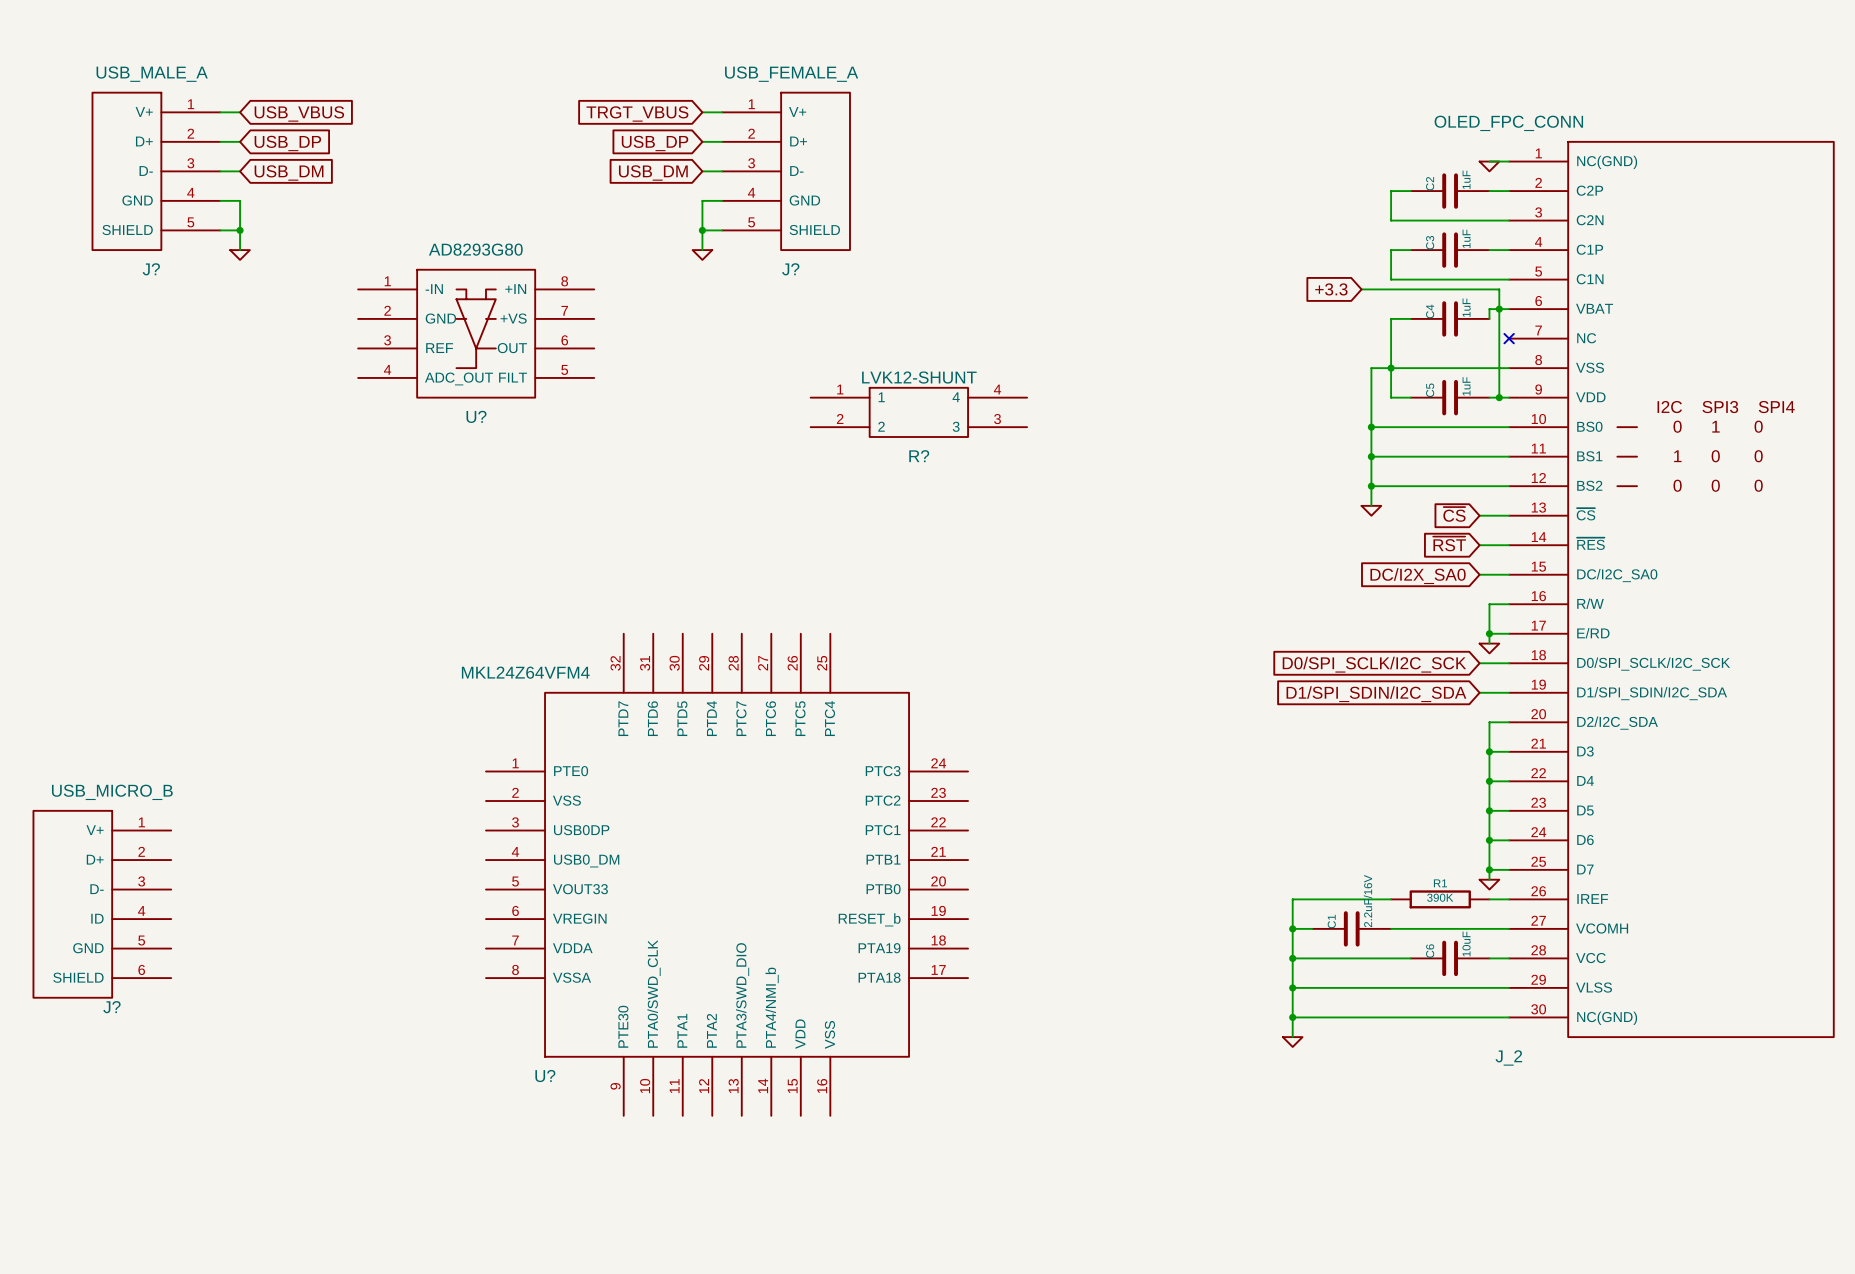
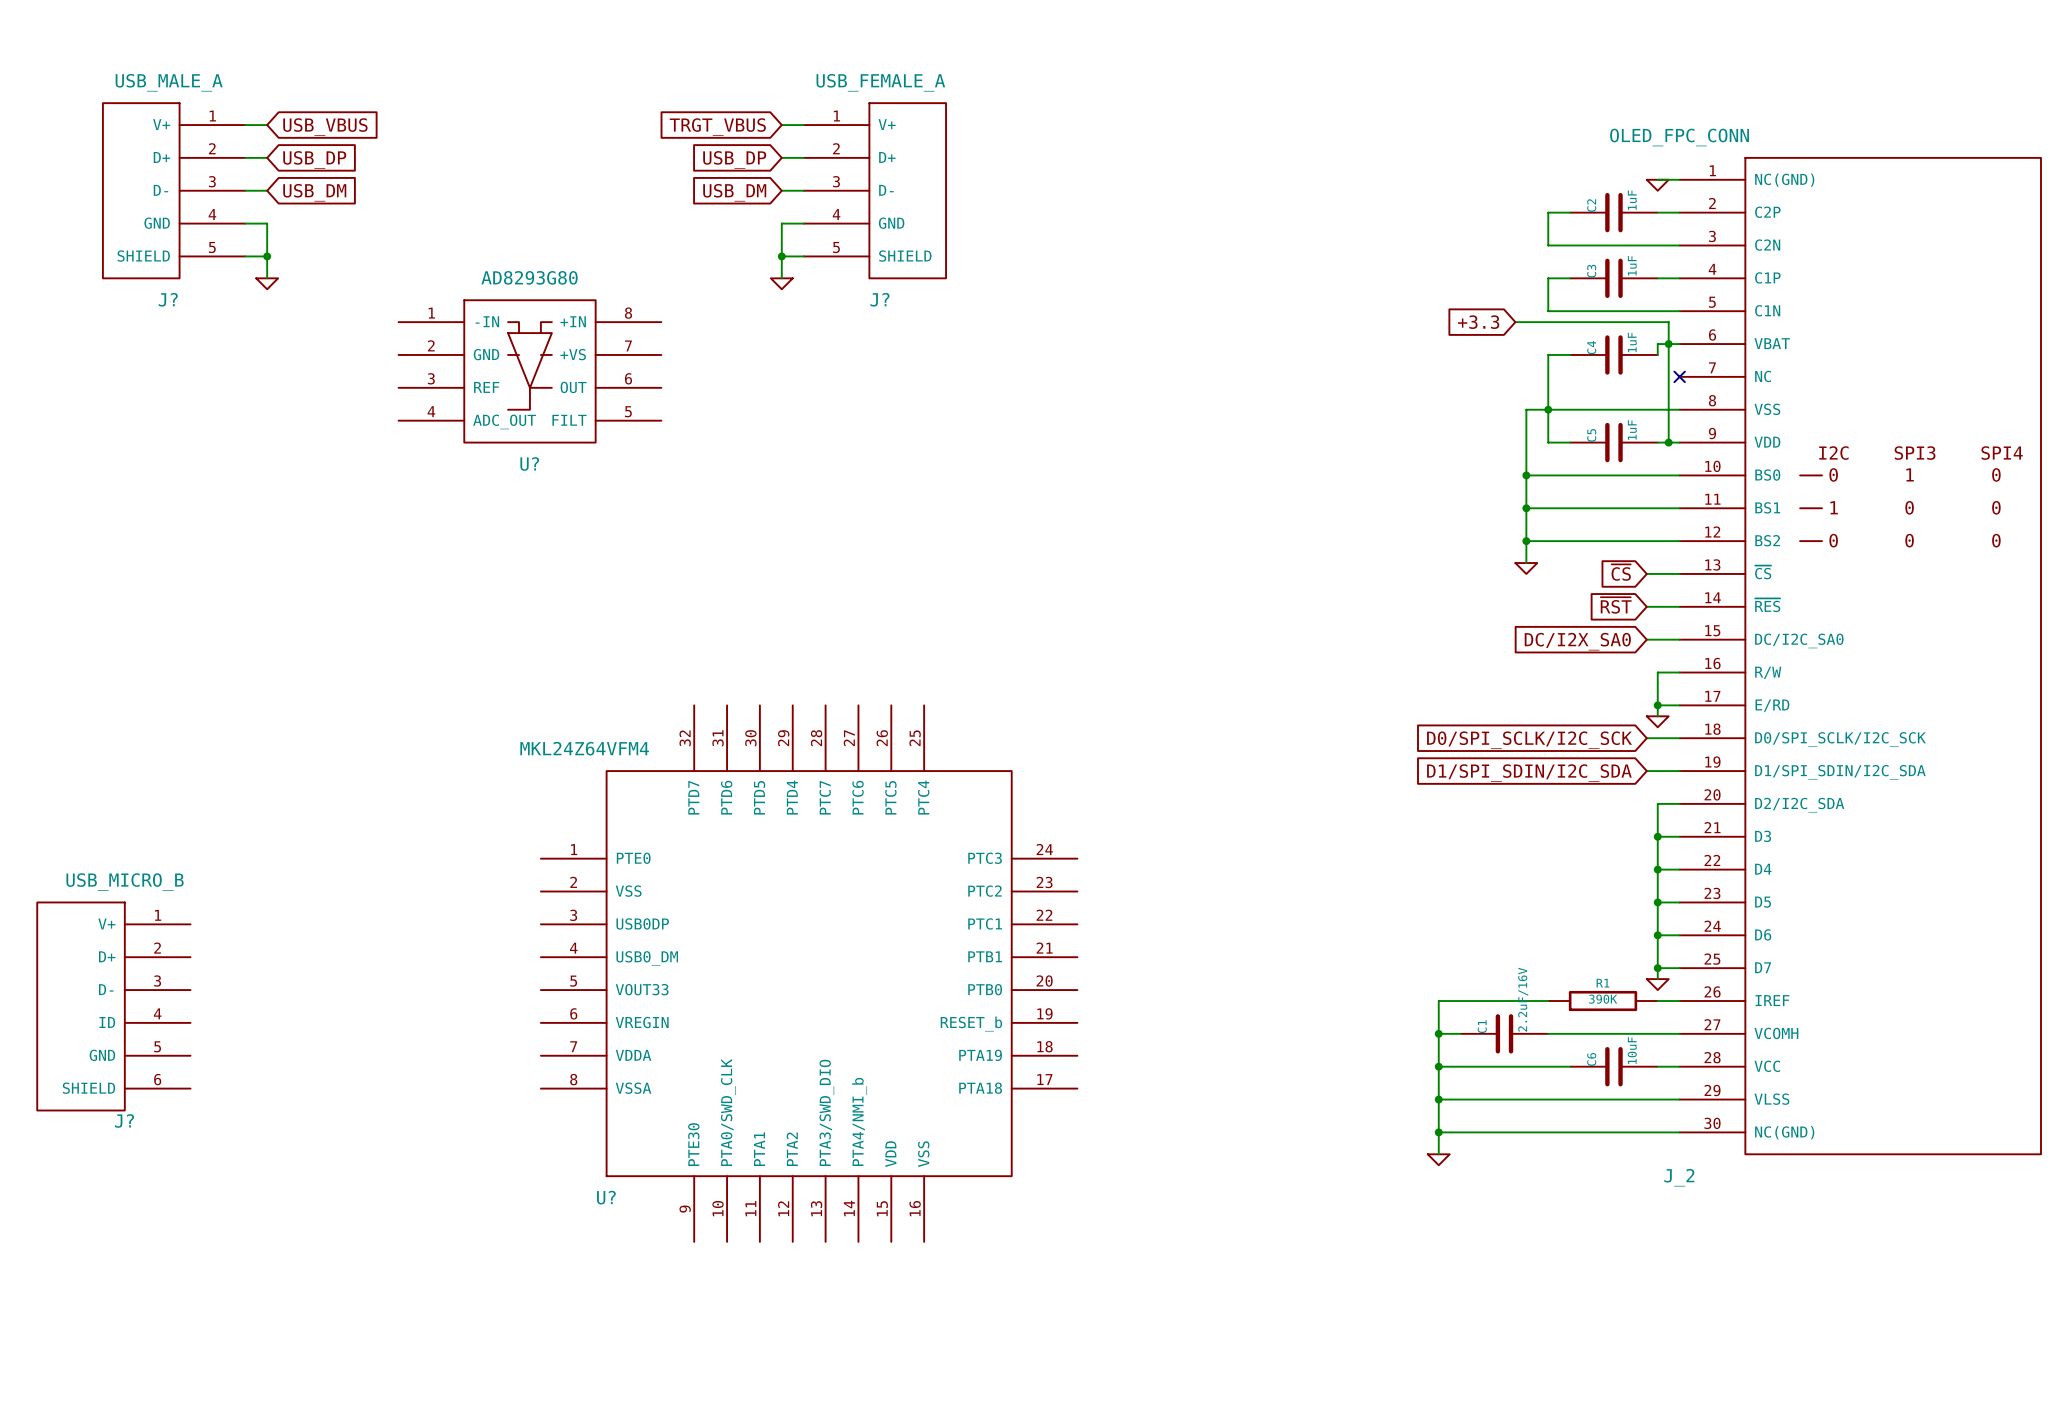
R?: LVK12-SHUNT (918, 412) -> none

